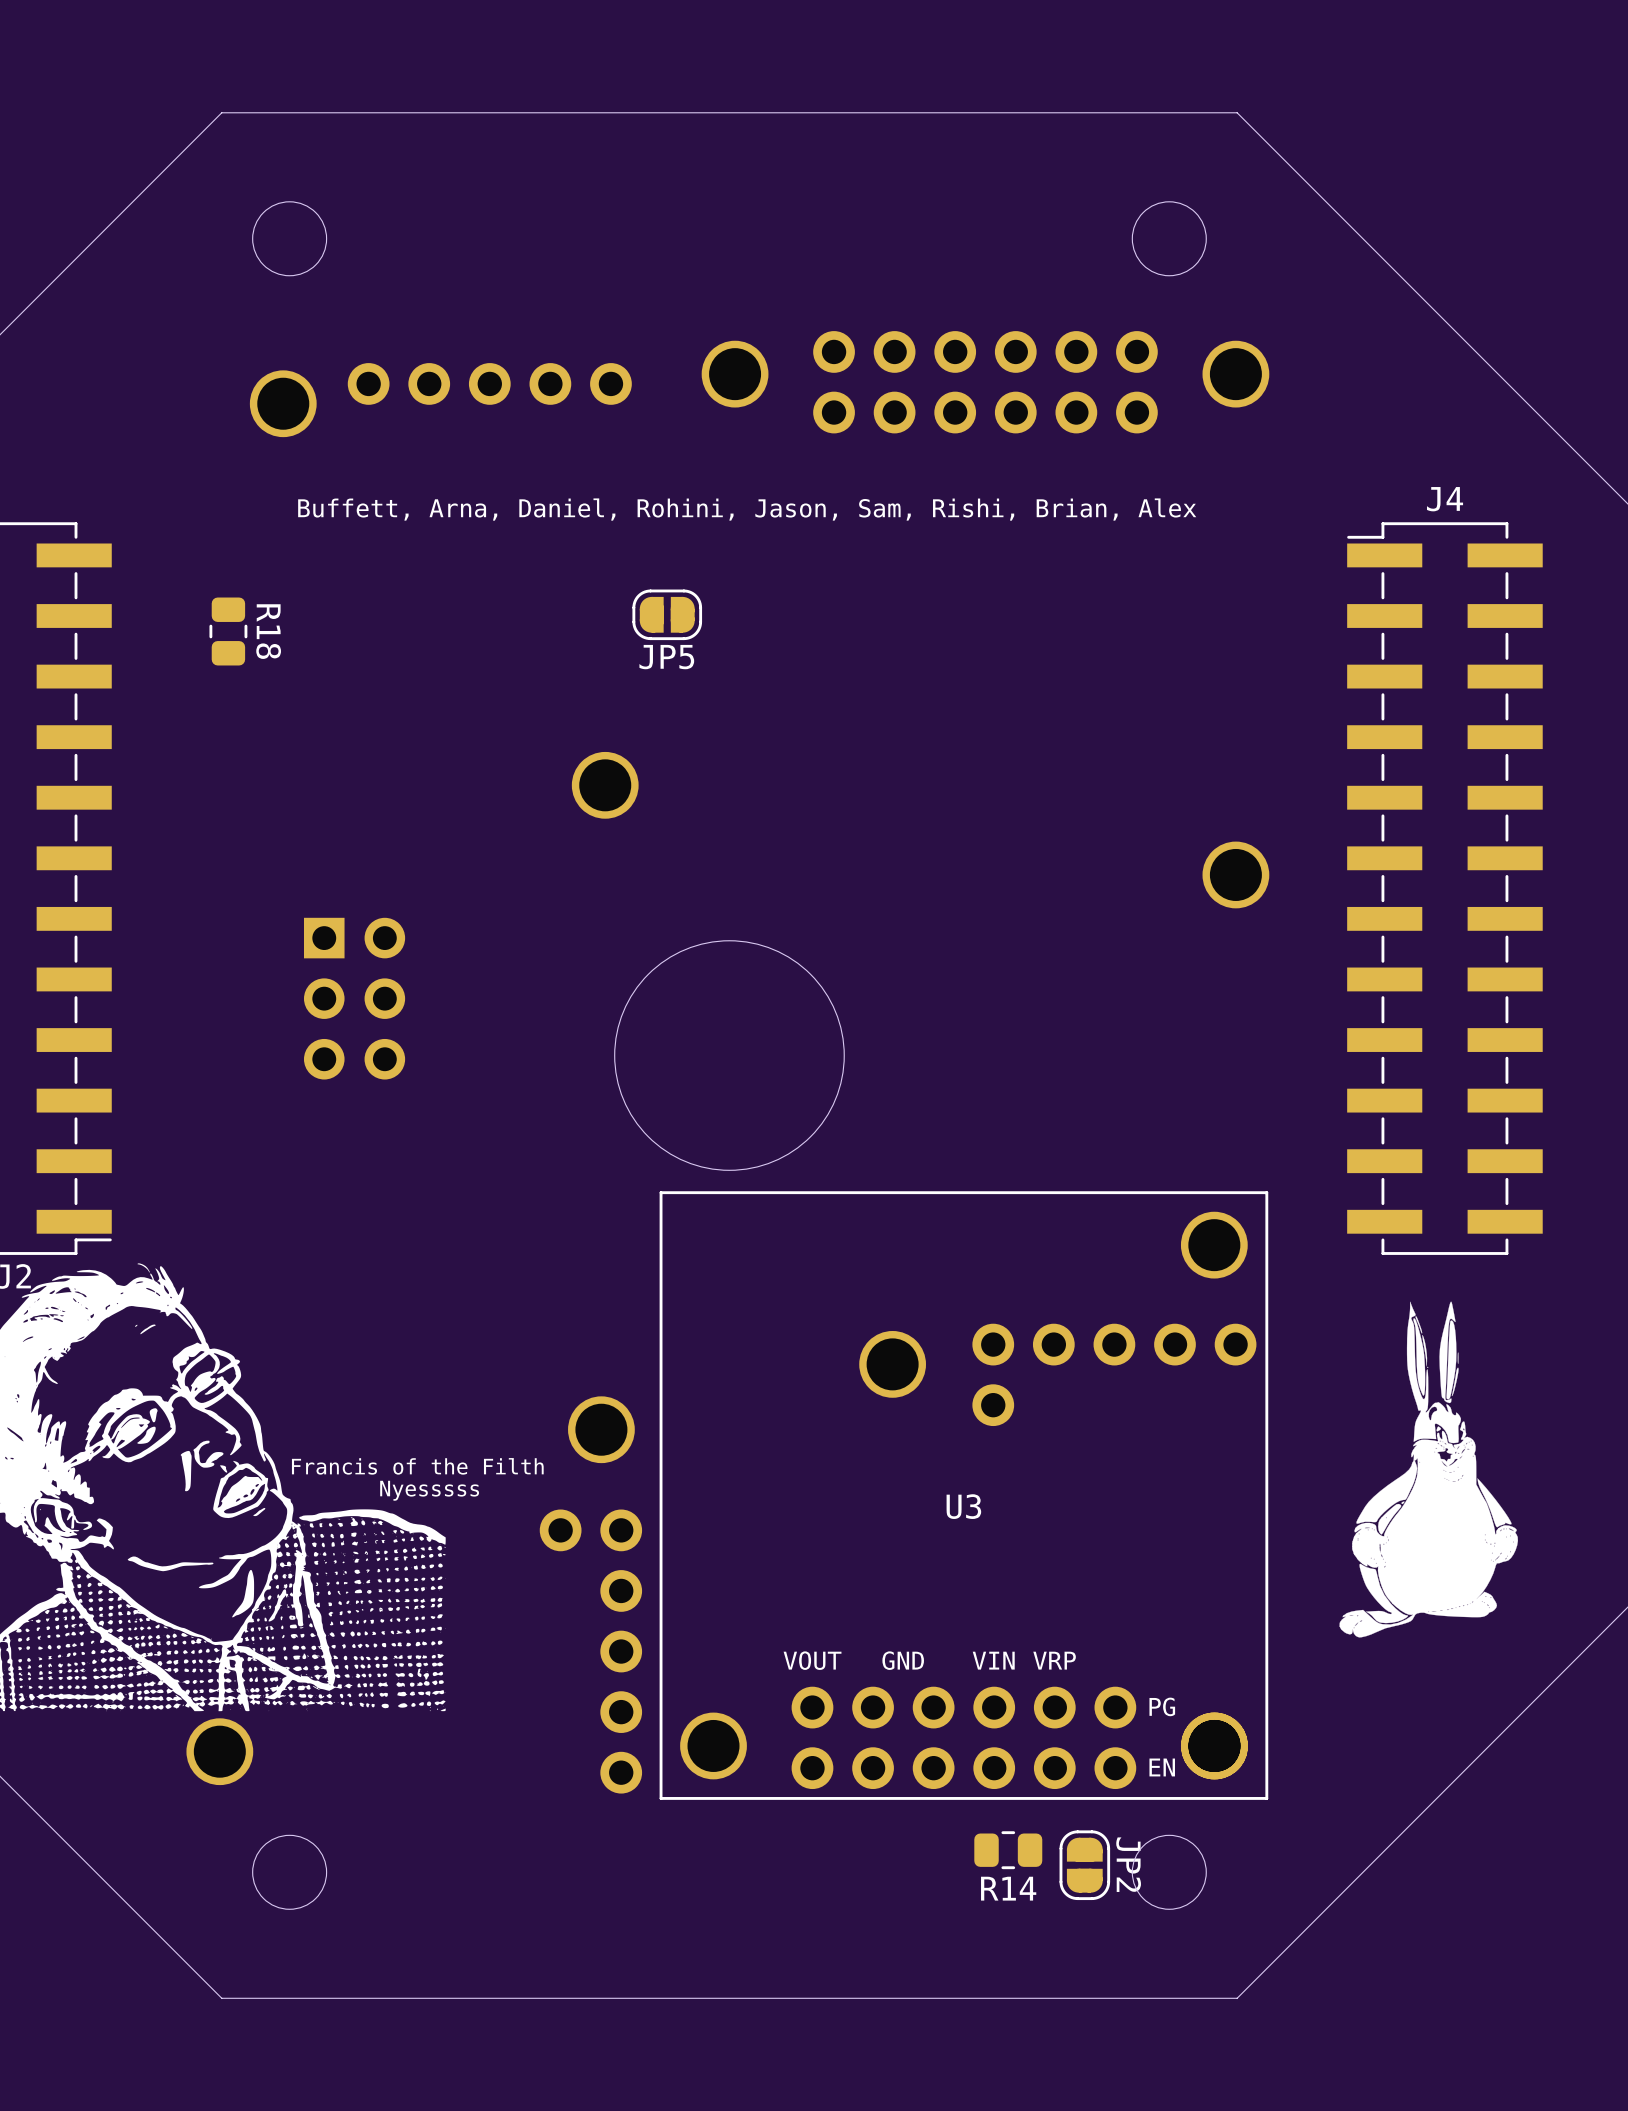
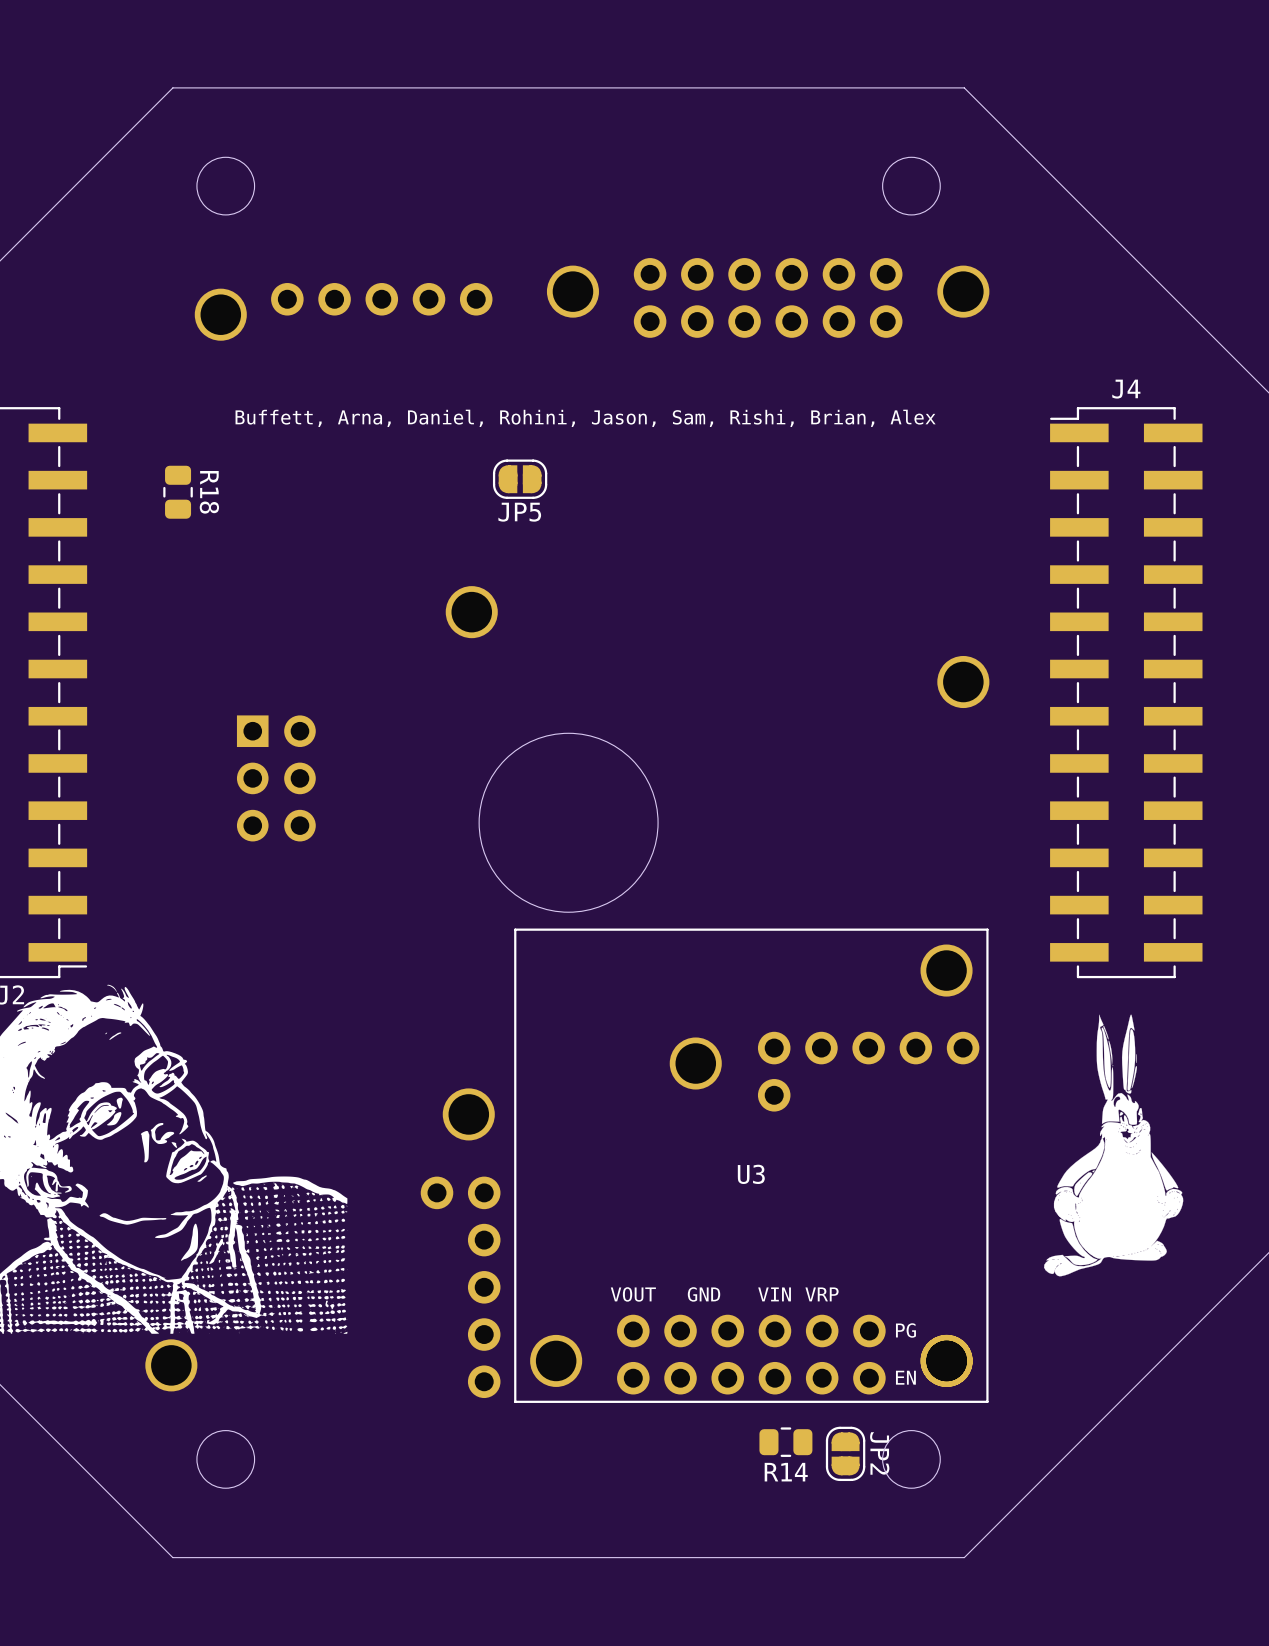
text position: Buffett, Arna, Daniel, Rohini, Jason, Sam, Rishi, Brian, Alex (747, 509) -> Buffett, Arna, Daniel, Rohini, Jason, Sam, Rishi, Brian, Alex (585, 418)
text: Francis of the Filth (417, 1466) -> none
text: Nyesssss (429, 1490) -> none

